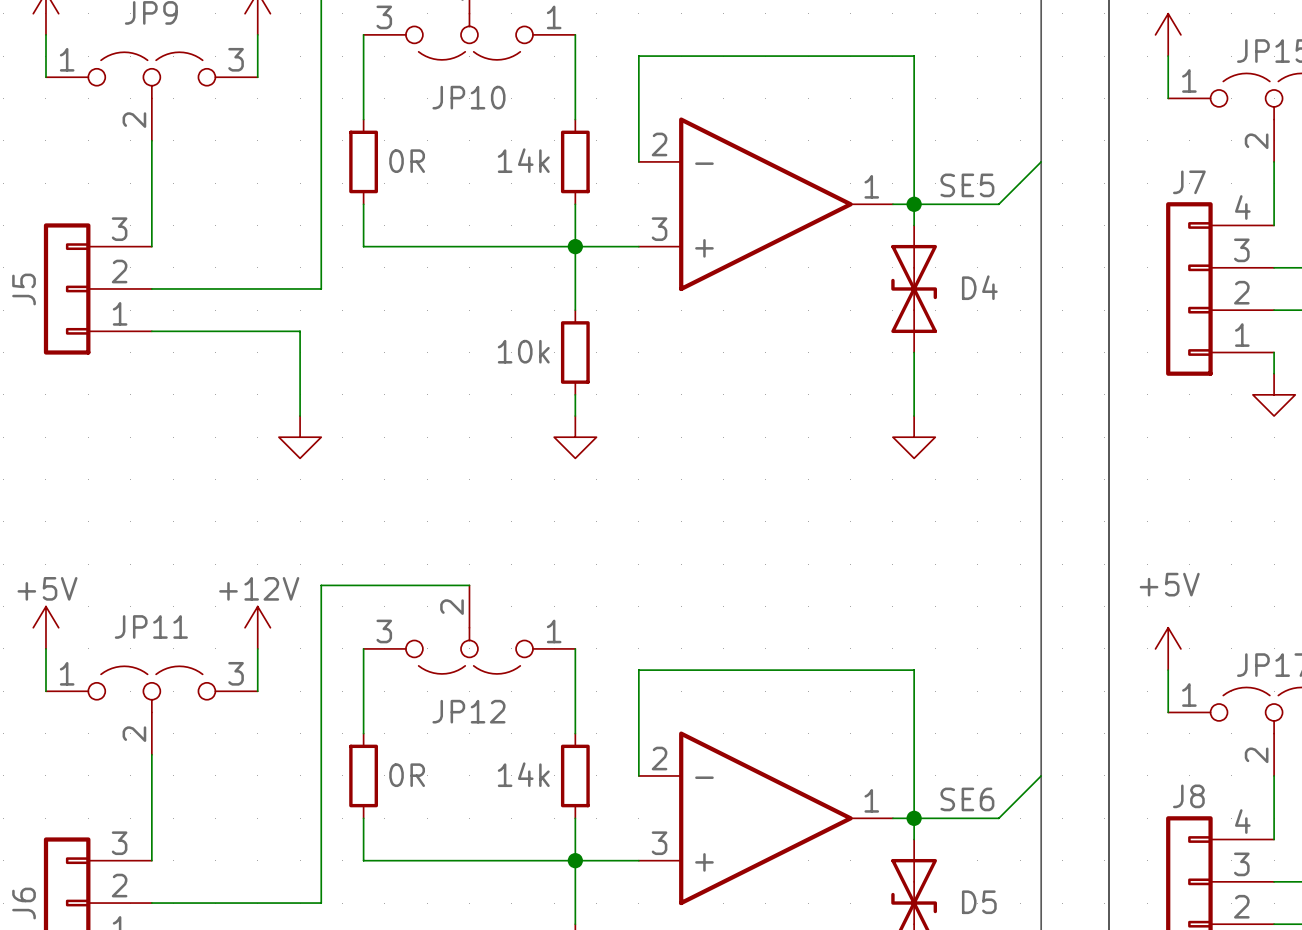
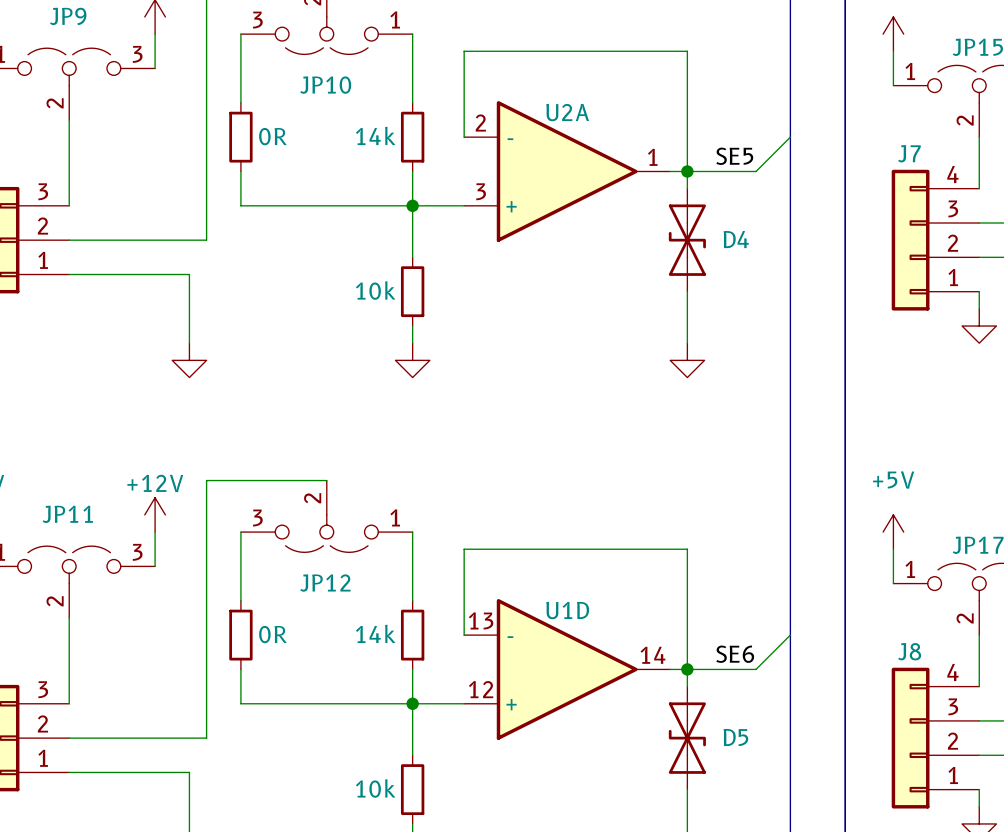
U2A name: none -> U2A (567, 112)
U1D name: none -> U1D (567, 610)
U1D pin number: 2 (659, 758) -> 13 (481, 620)
U1D pin number: 1 (871, 800) -> 14 (653, 655)
U1D pin number: 3 (659, 843) -> 12 (481, 689)

